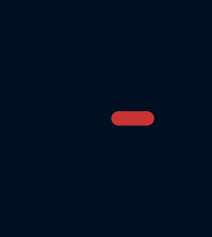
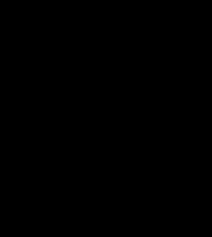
part: (132, 118) -> none

